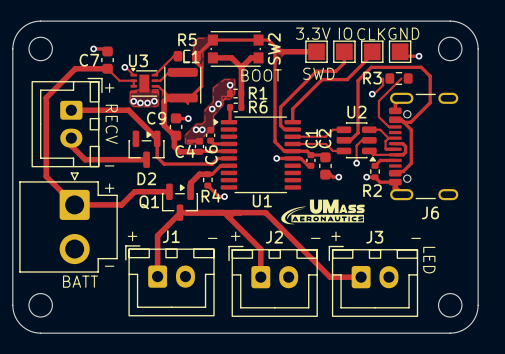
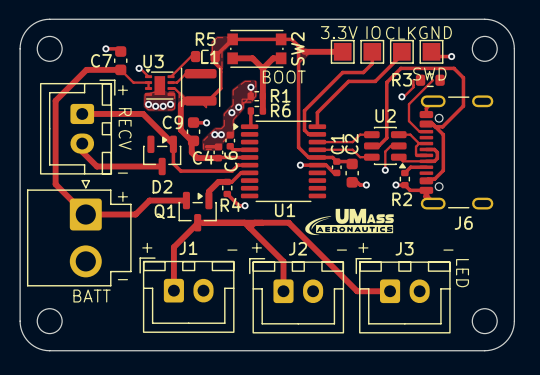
text position: SWD (318, 73) -> SWD (429, 74)

